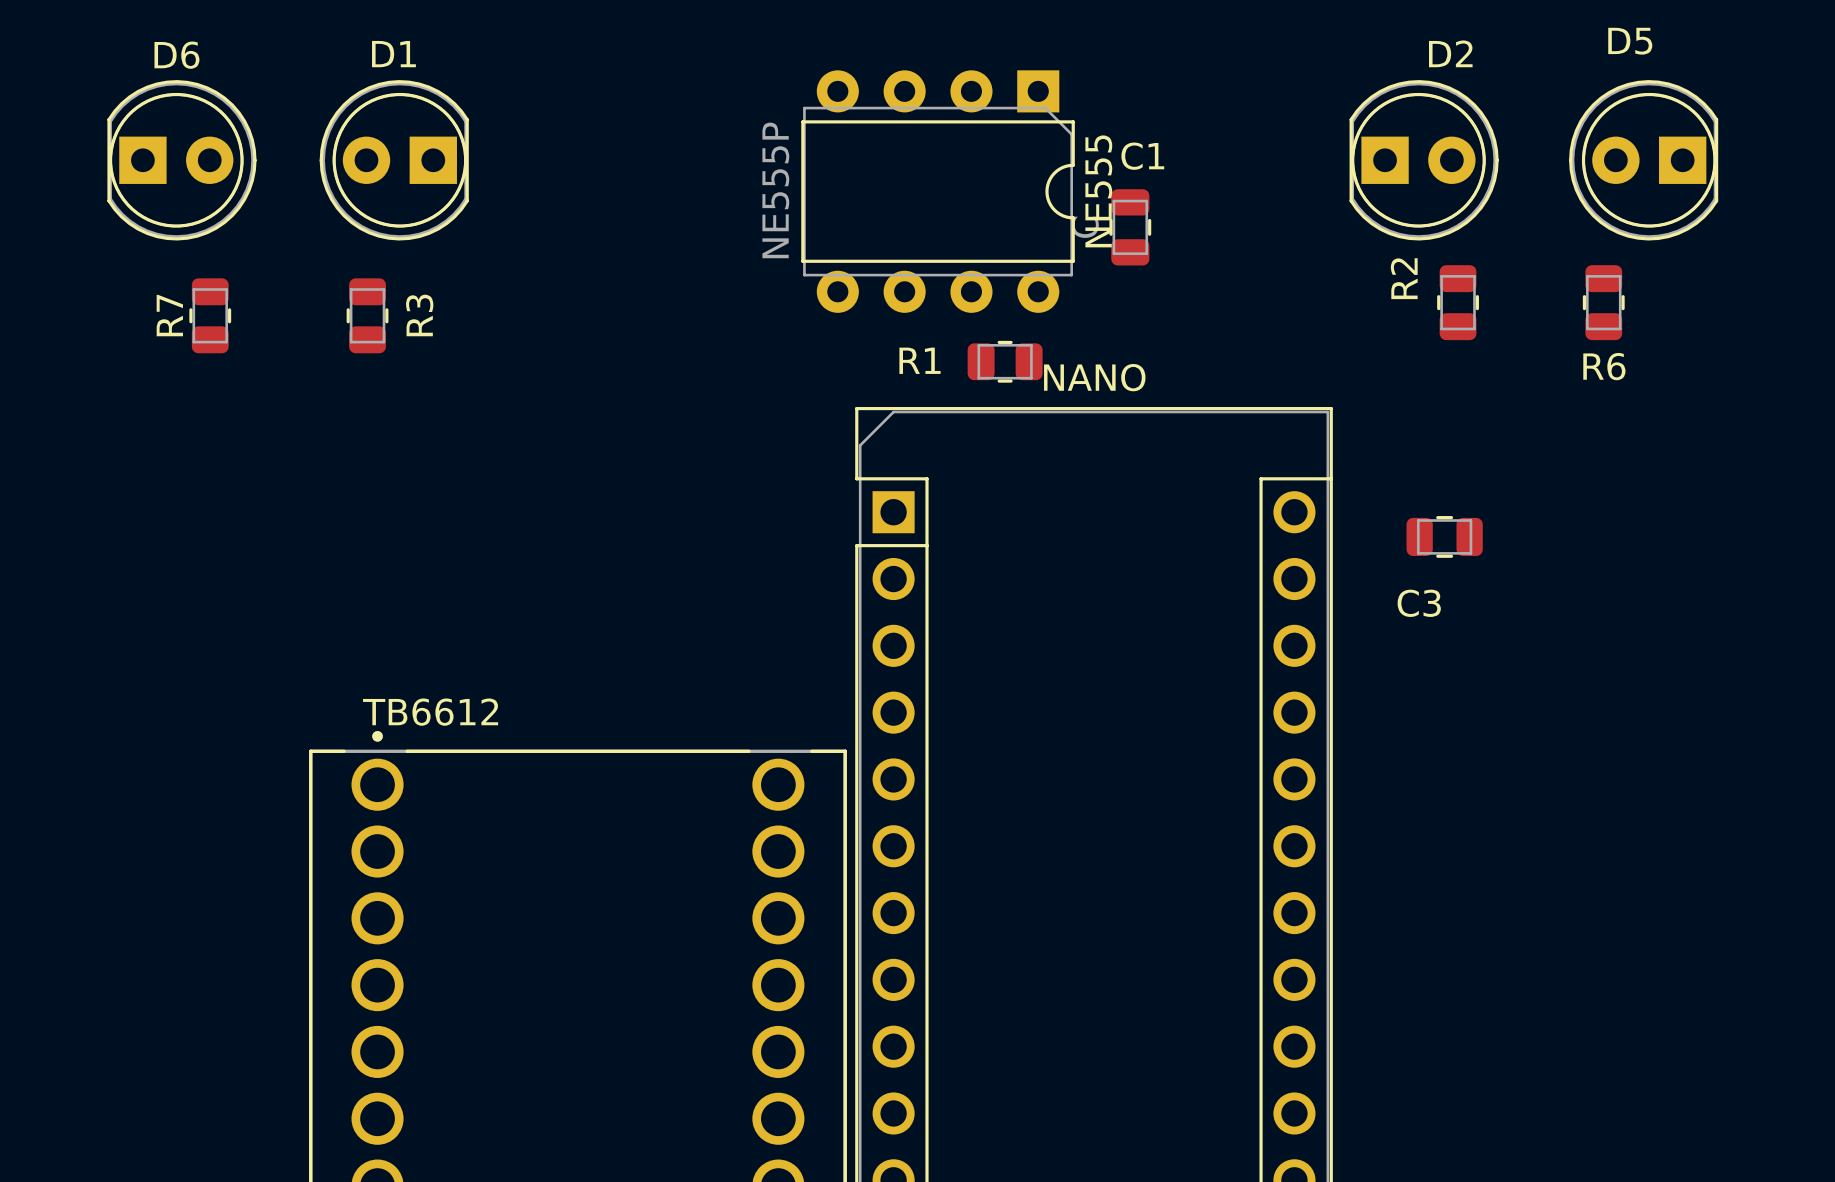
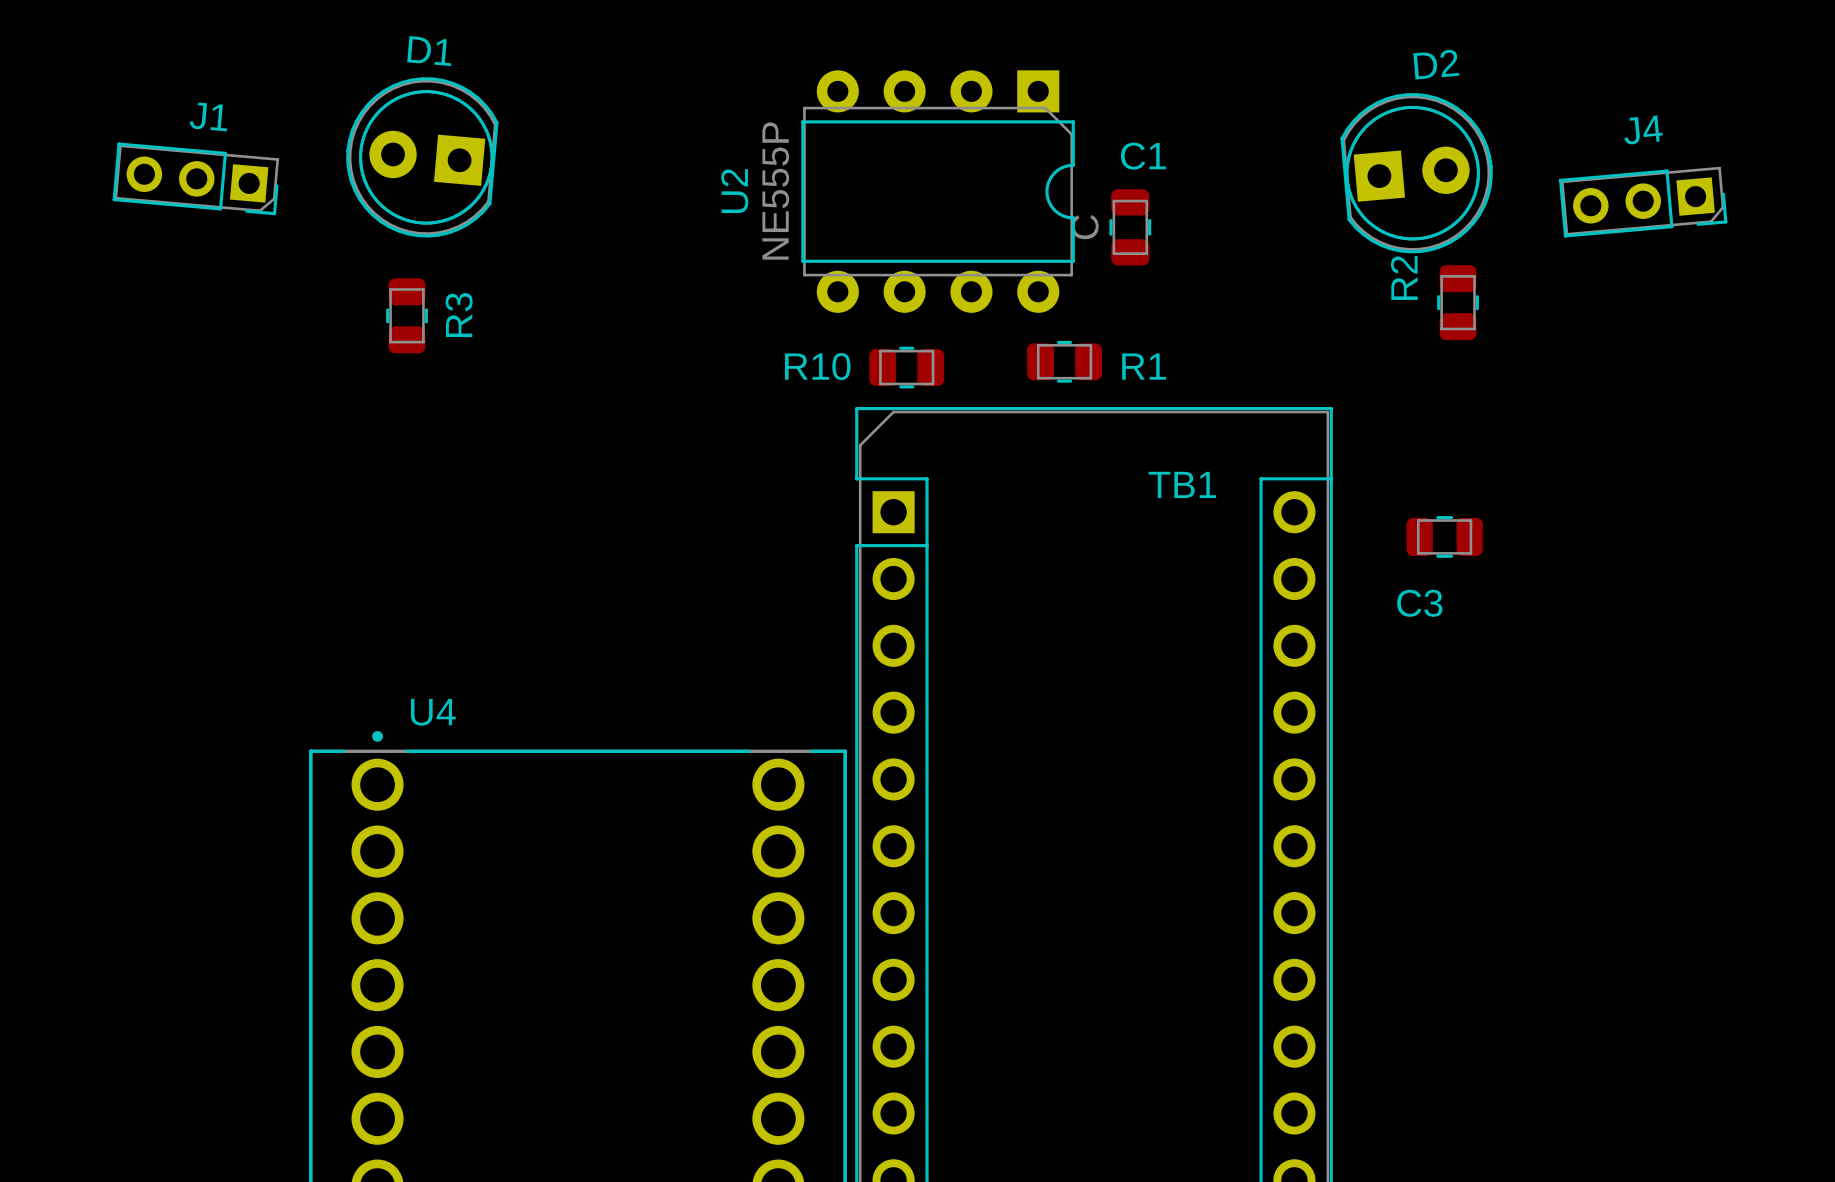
D6: (181, 160) -> none
D1 rotation: 0° (394, 160) -> 5° clockwise (422, 157)
D2 rotation: 0° (1424, 160) -> 5° counterclockwise (1416, 173)
D5: (1643, 160) -> none
J1: none -> (195, 178)
NE555 name: NE555 (1098, 191) -> U2 (734, 191)
J4: none -> (1643, 202)
R6: (1603, 302) -> none
R7: (210, 315) -> none
R3 position: (367, 315) -> (407, 315)
R1 name position: R1 (920, 360) -> R1 (1144, 366)
R1 position: (1005, 361) -> (1064, 361)
R10: none -> (906, 367)
NANO name: NANO (1094, 377) -> TB1 (1182, 484)
TB6612 name: TB6612 (430, 712) -> U4 (433, 712)

